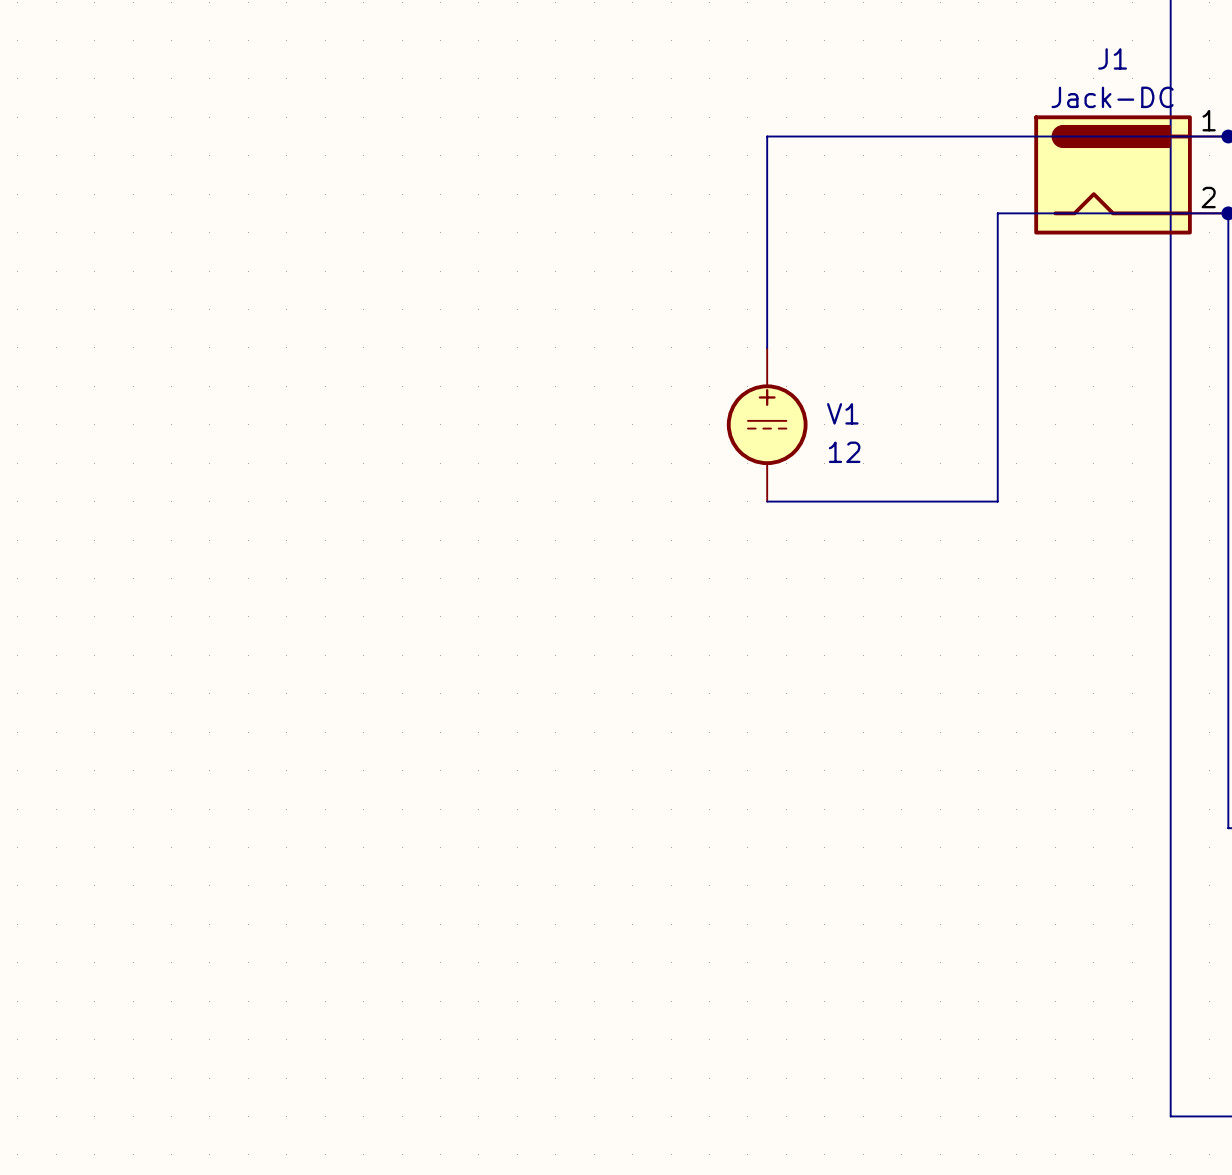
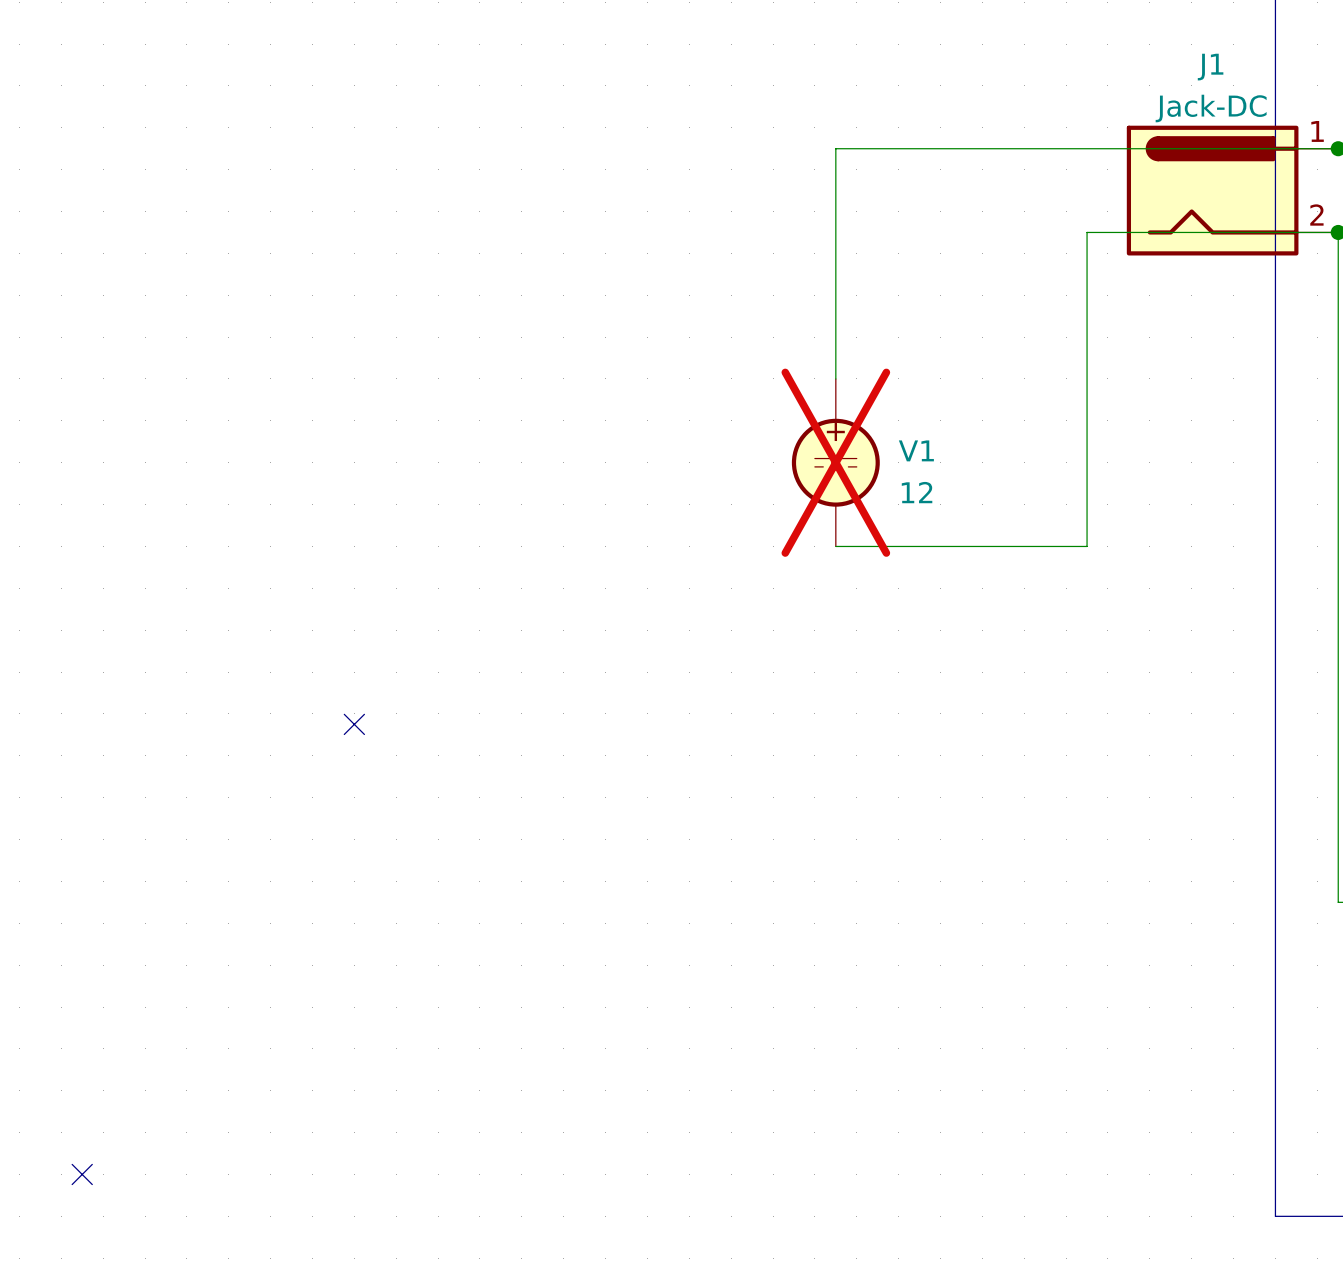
V1 do-not-place cross: none -> (835, 462)
no-connect mark: none -> (354, 724)
no-connect mark: none -> (82, 1174)

